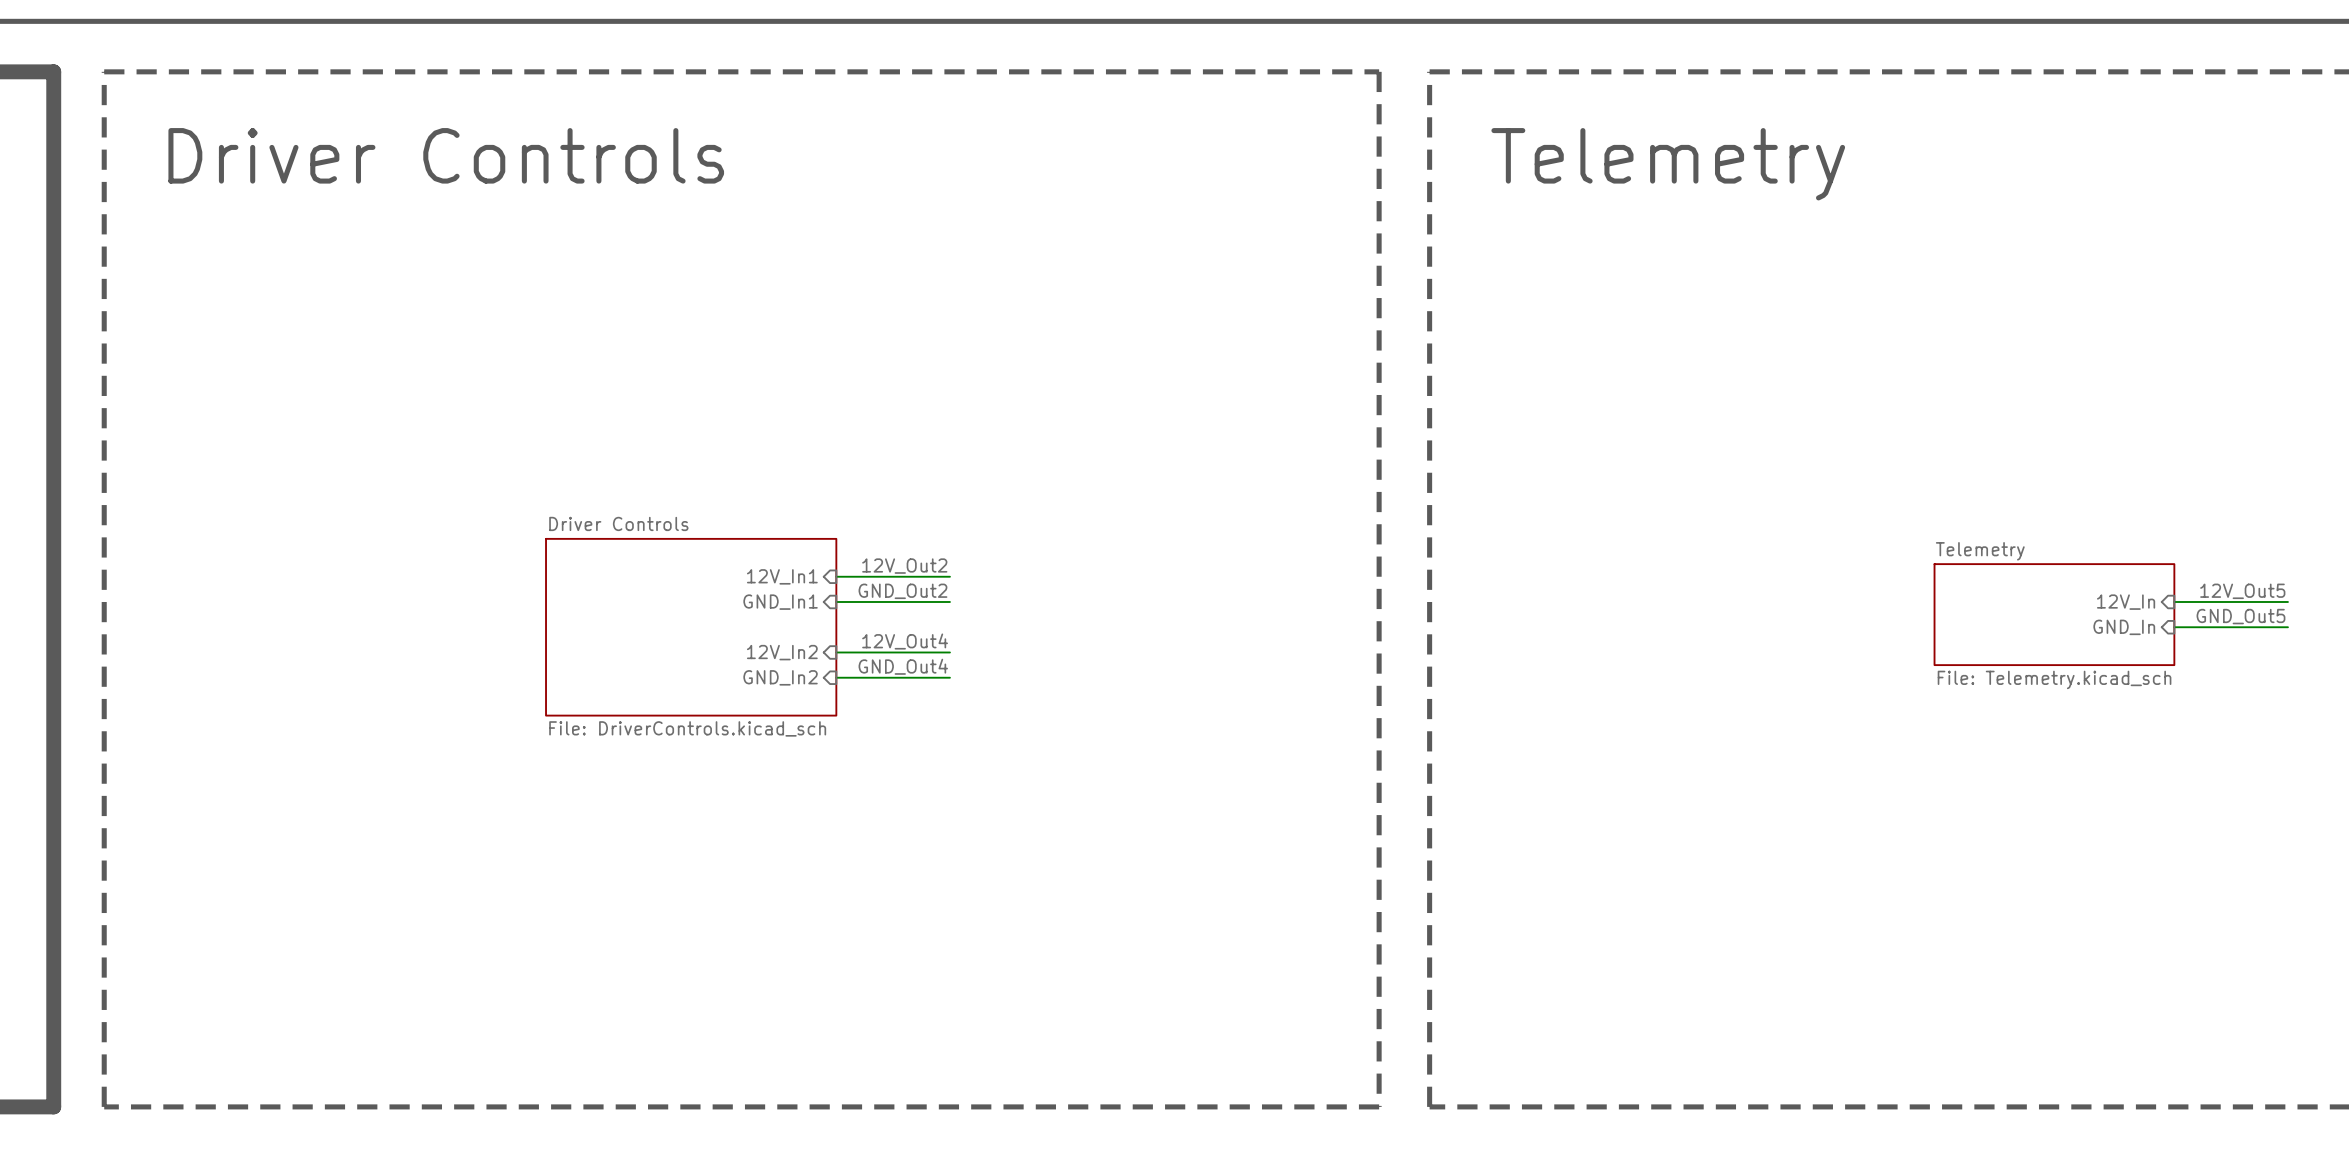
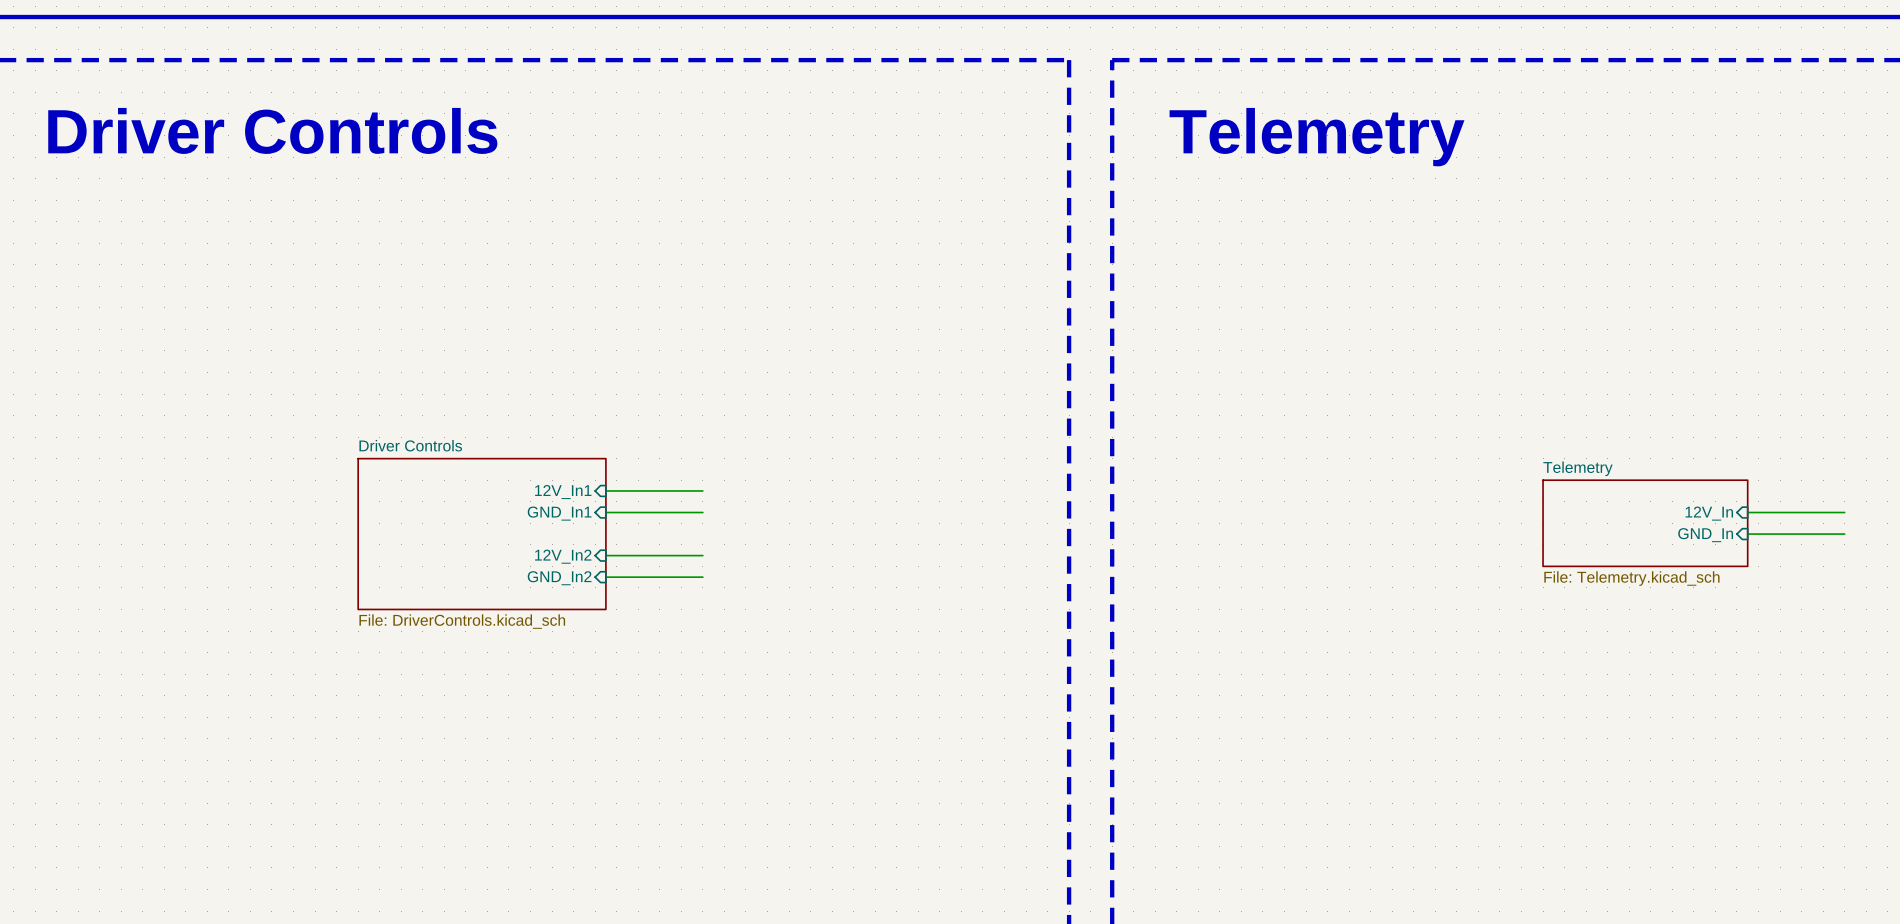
label: 12V_Out2 (904, 566) -> none
label: GND_Out2 (902, 591) -> none
label: 12V_Out5 (2242, 591) -> none
label: GND_Out5 (2240, 616) -> none
label: 12V_Out4 (905, 641) -> none
label: GND_Out4 (903, 666) -> none

